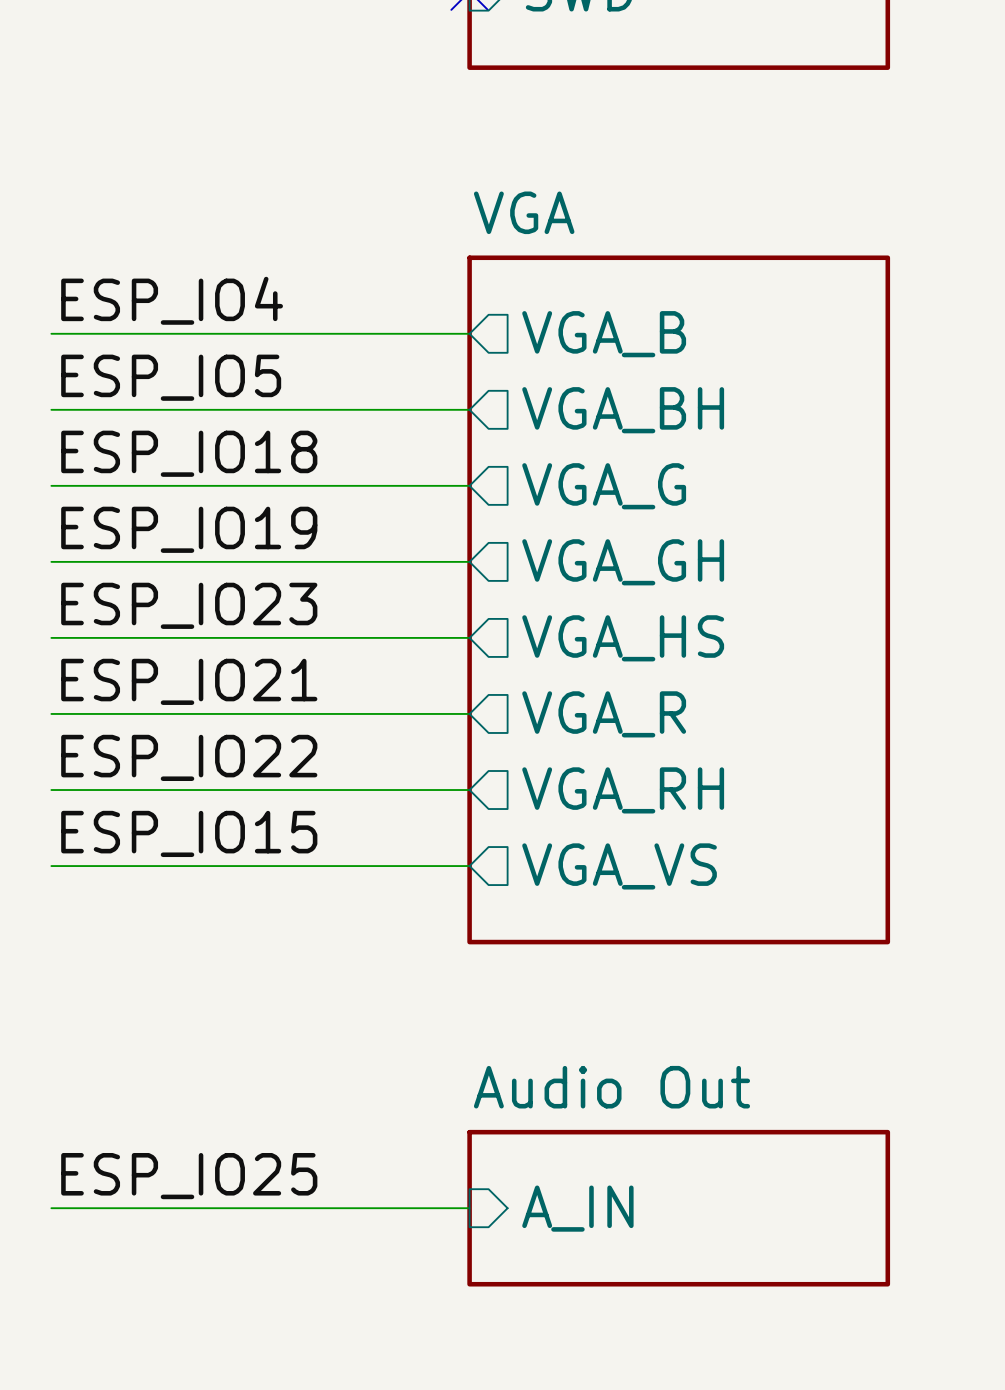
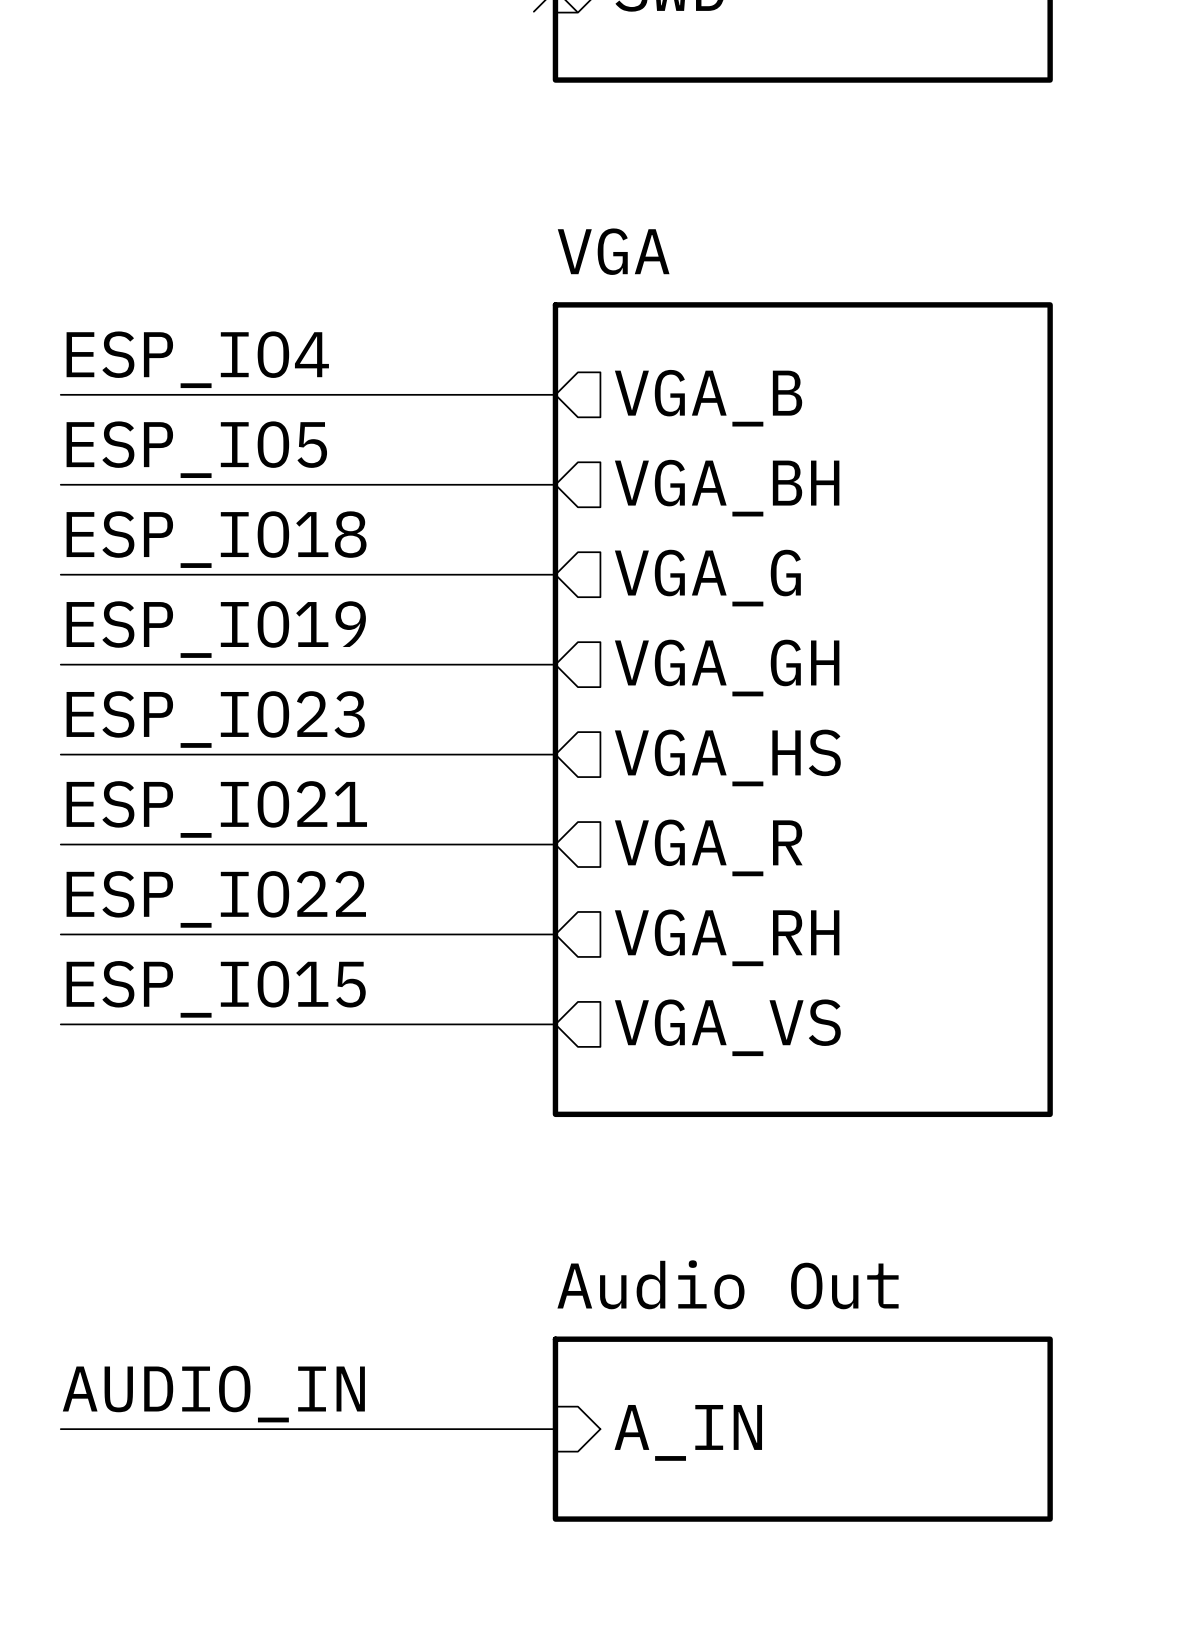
label: ESP_IO25 (189, 1176) -> AUDIO_IN (213, 1394)

